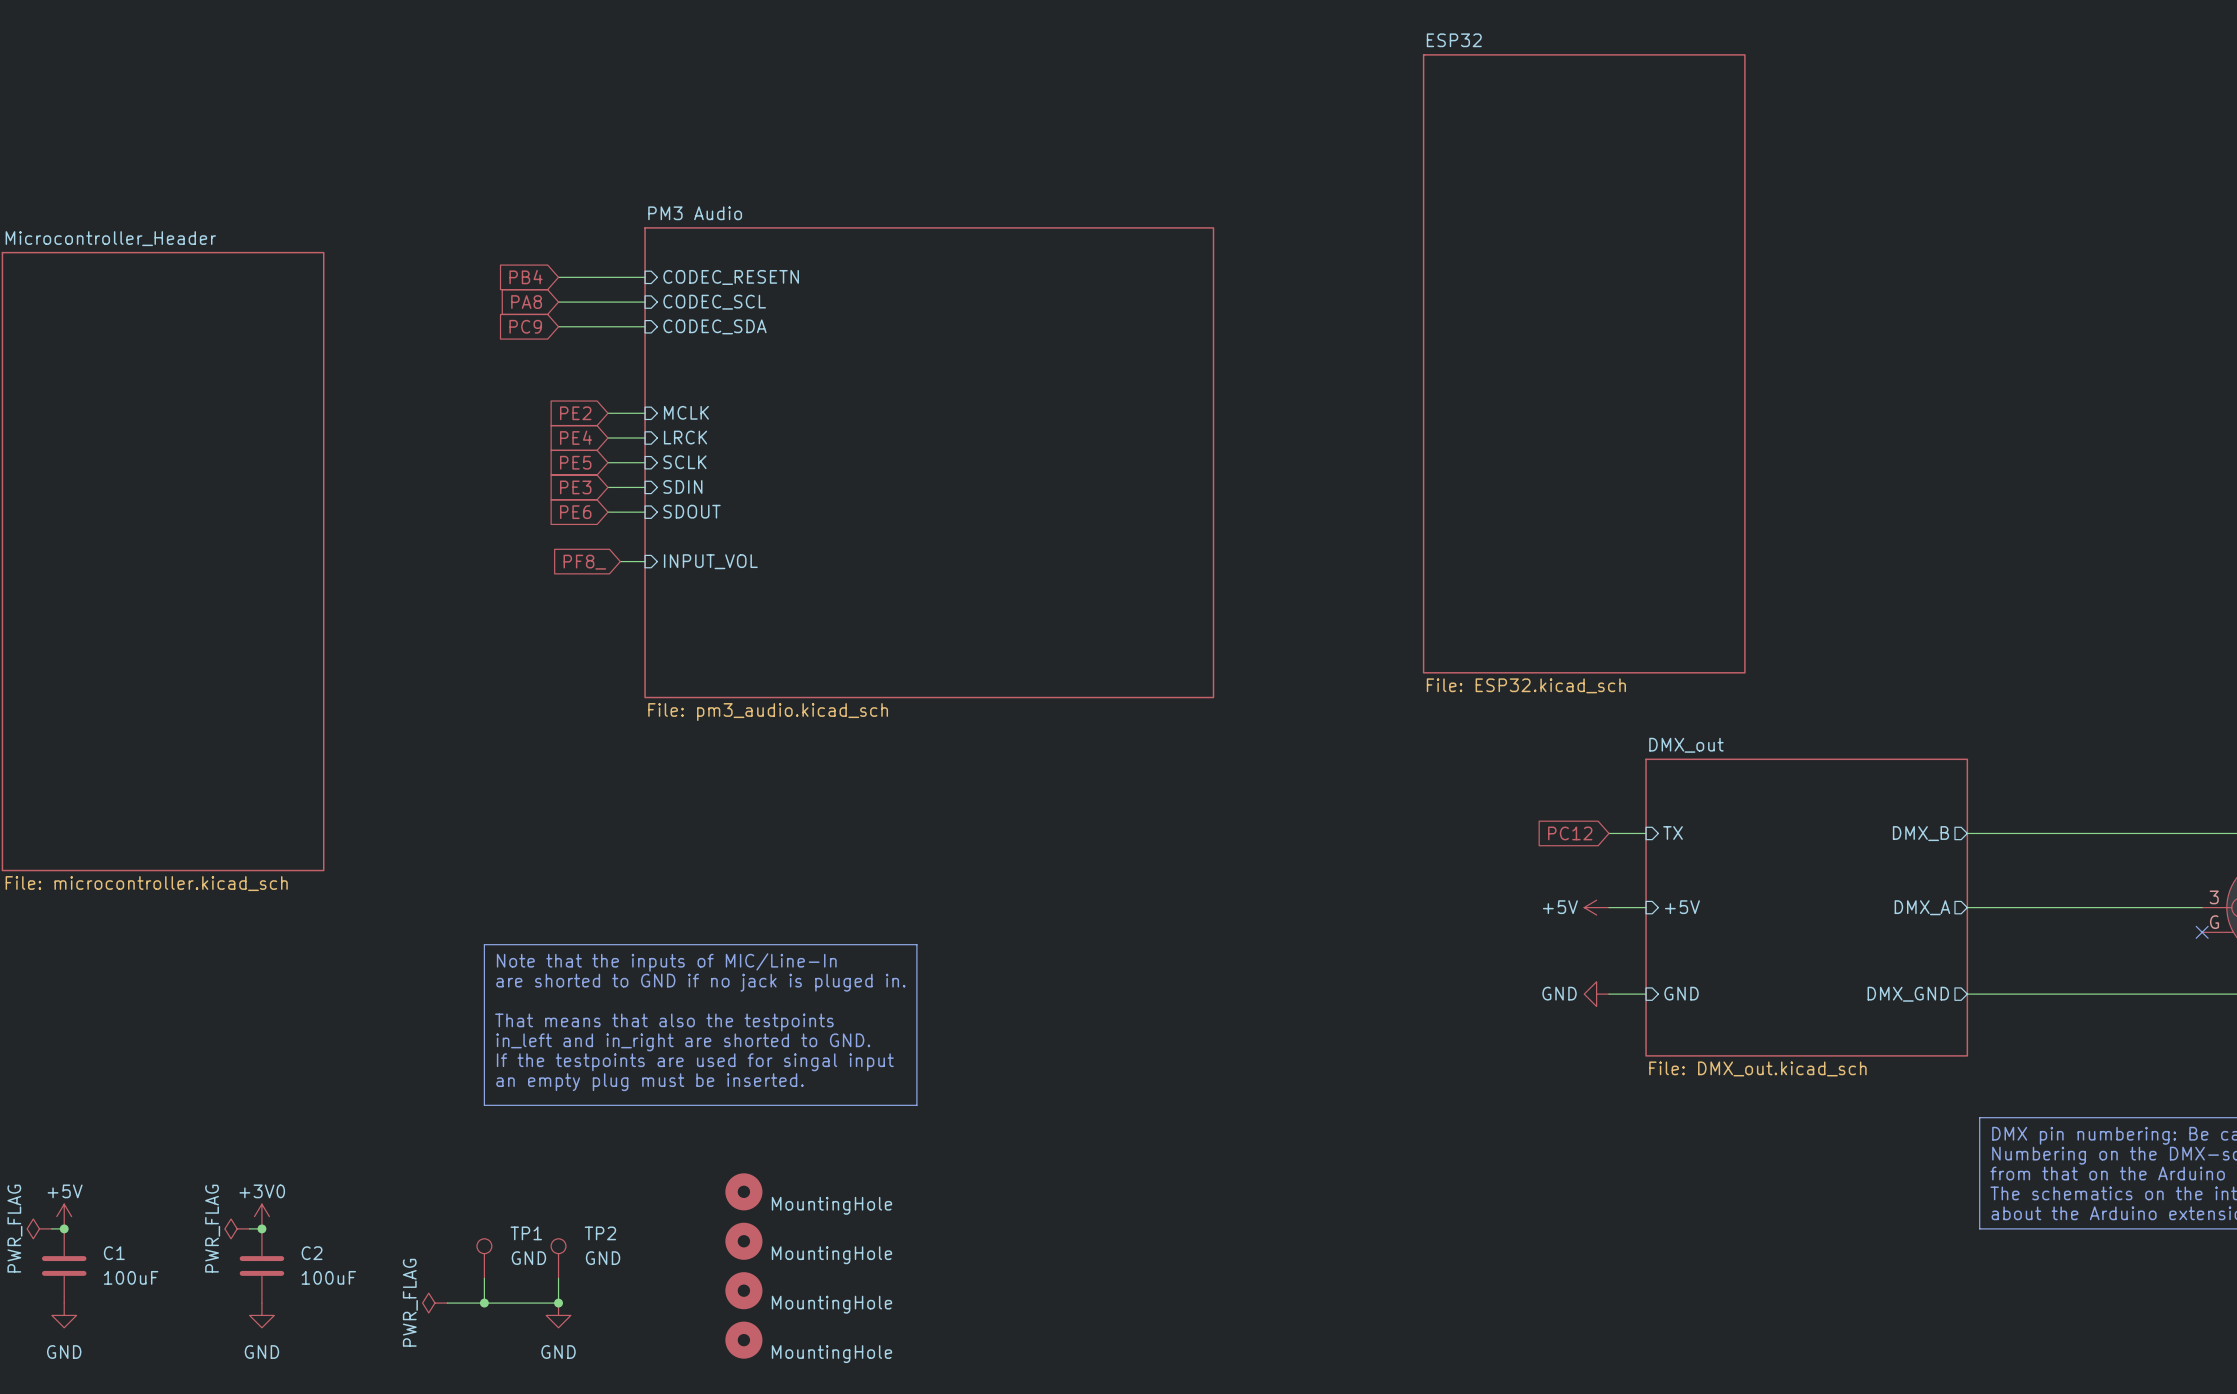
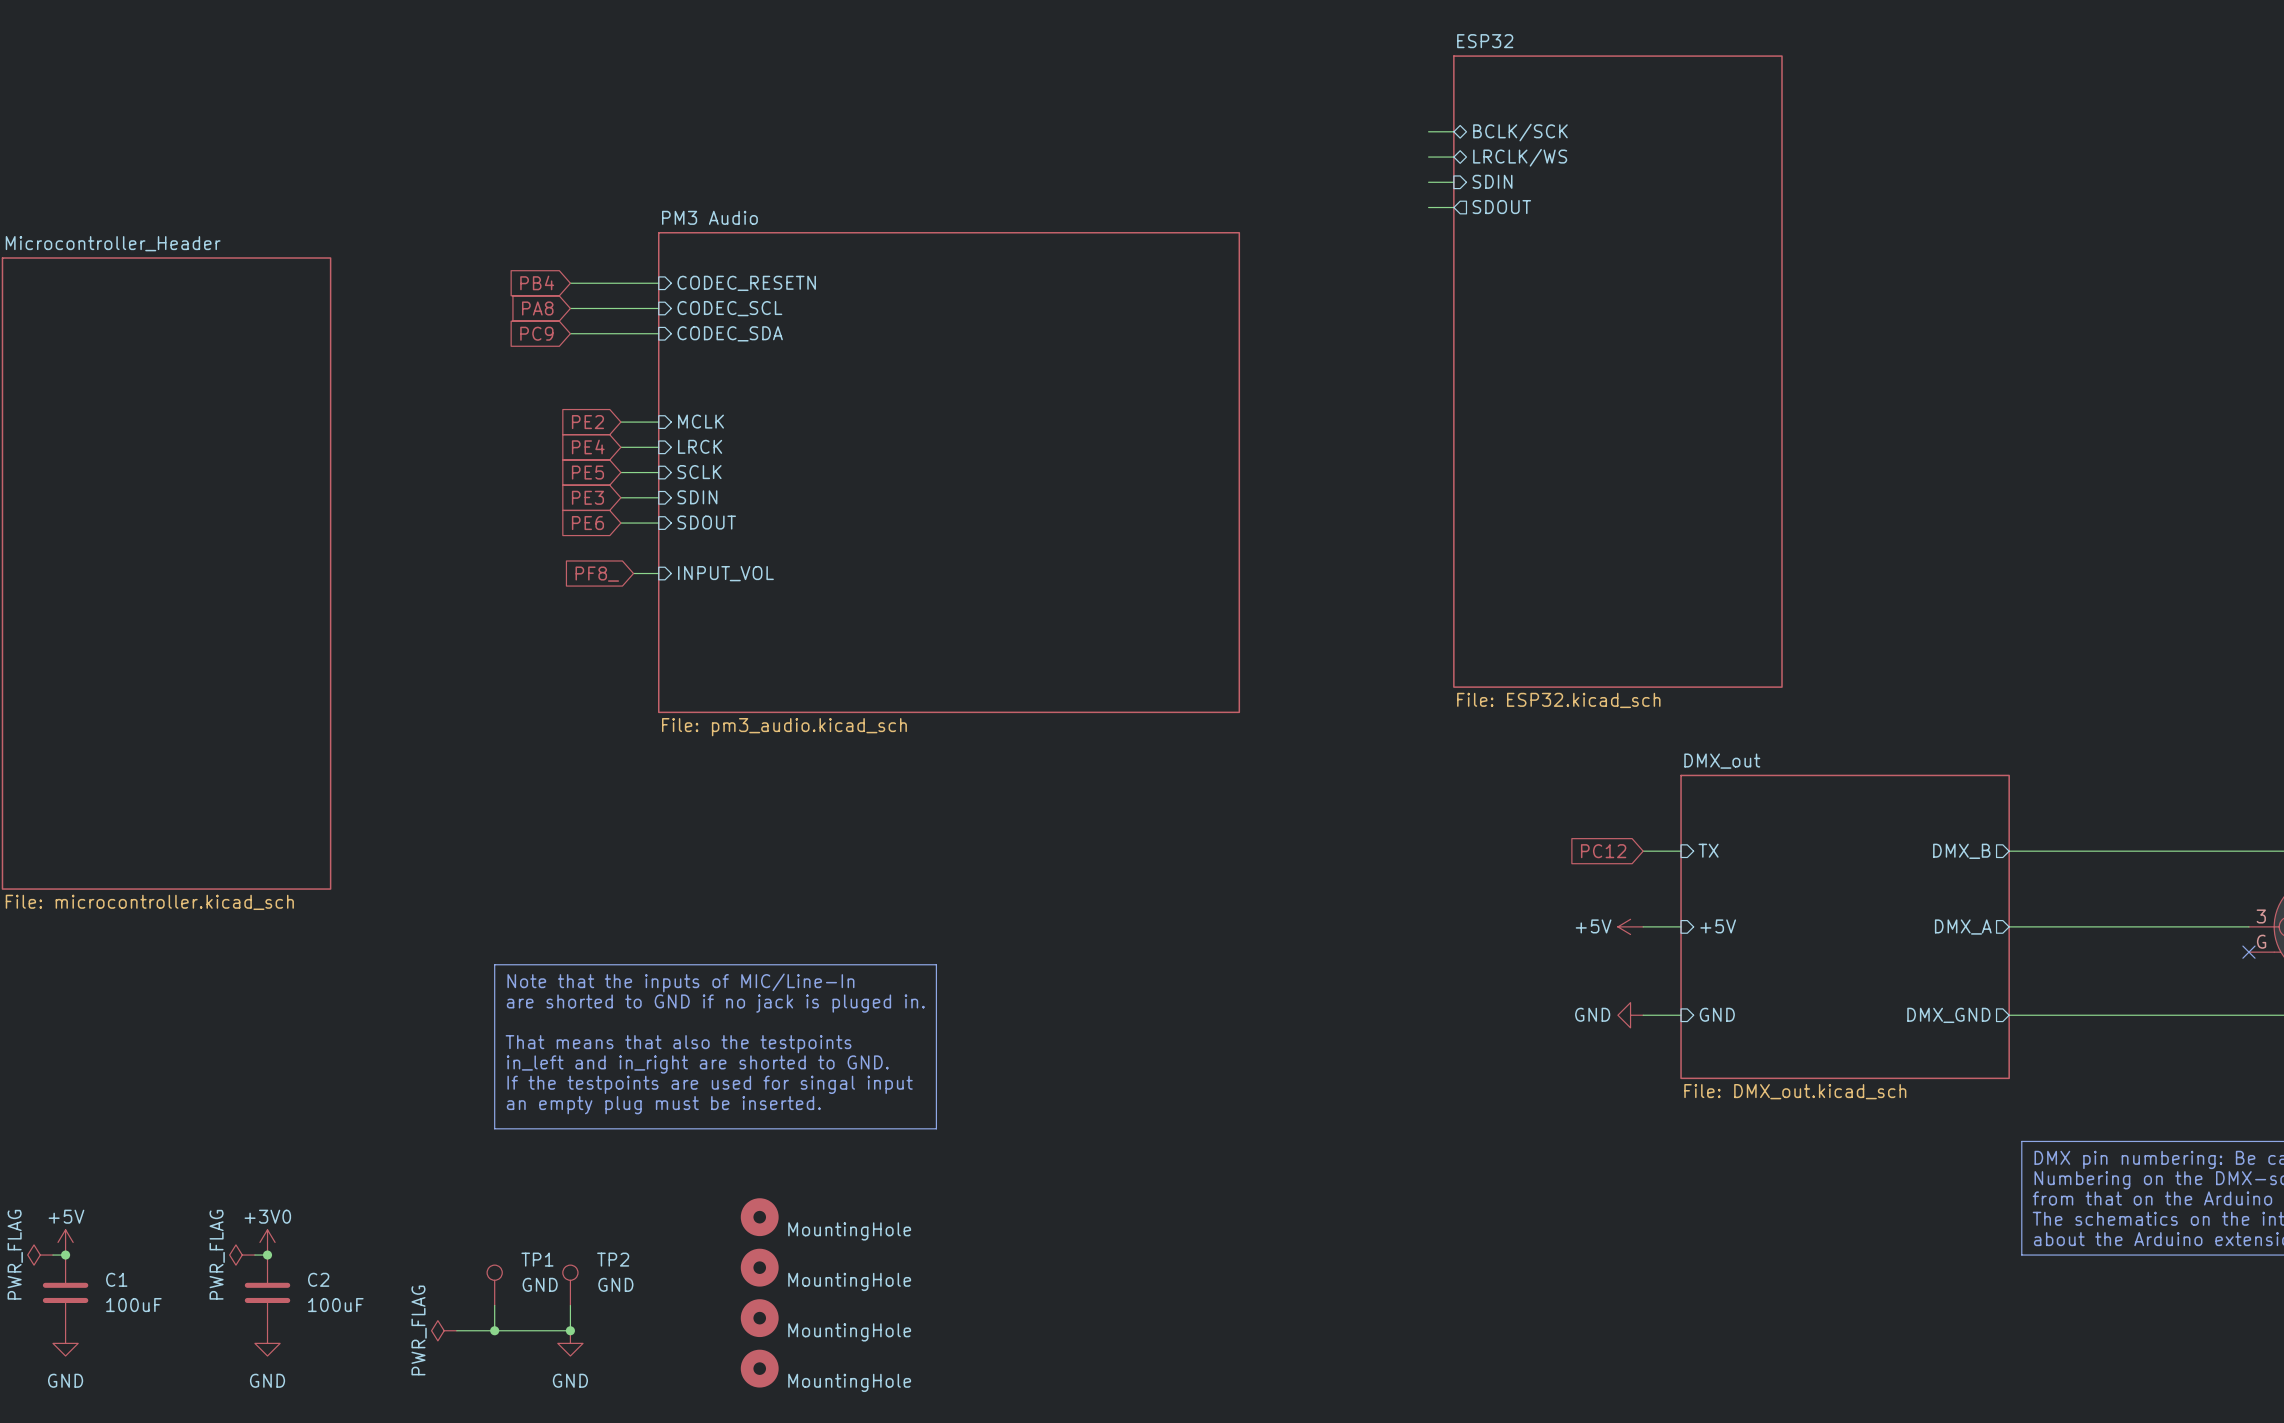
wire: none -> (1428, 131) (1453, 131)
sheet pin: none -> BCLK/SCK (1520, 132)
wire: none -> (1428, 157) (1453, 157)
sheet pin: none -> LRCLK/WS (1520, 157)
wire: none -> (1428, 182) (1453, 182)
sheet pin: none -> SDIN (1492, 181)
sheet pin: none -> SDOUT (1501, 207)
wire: none -> (1428, 207) (1453, 207)

